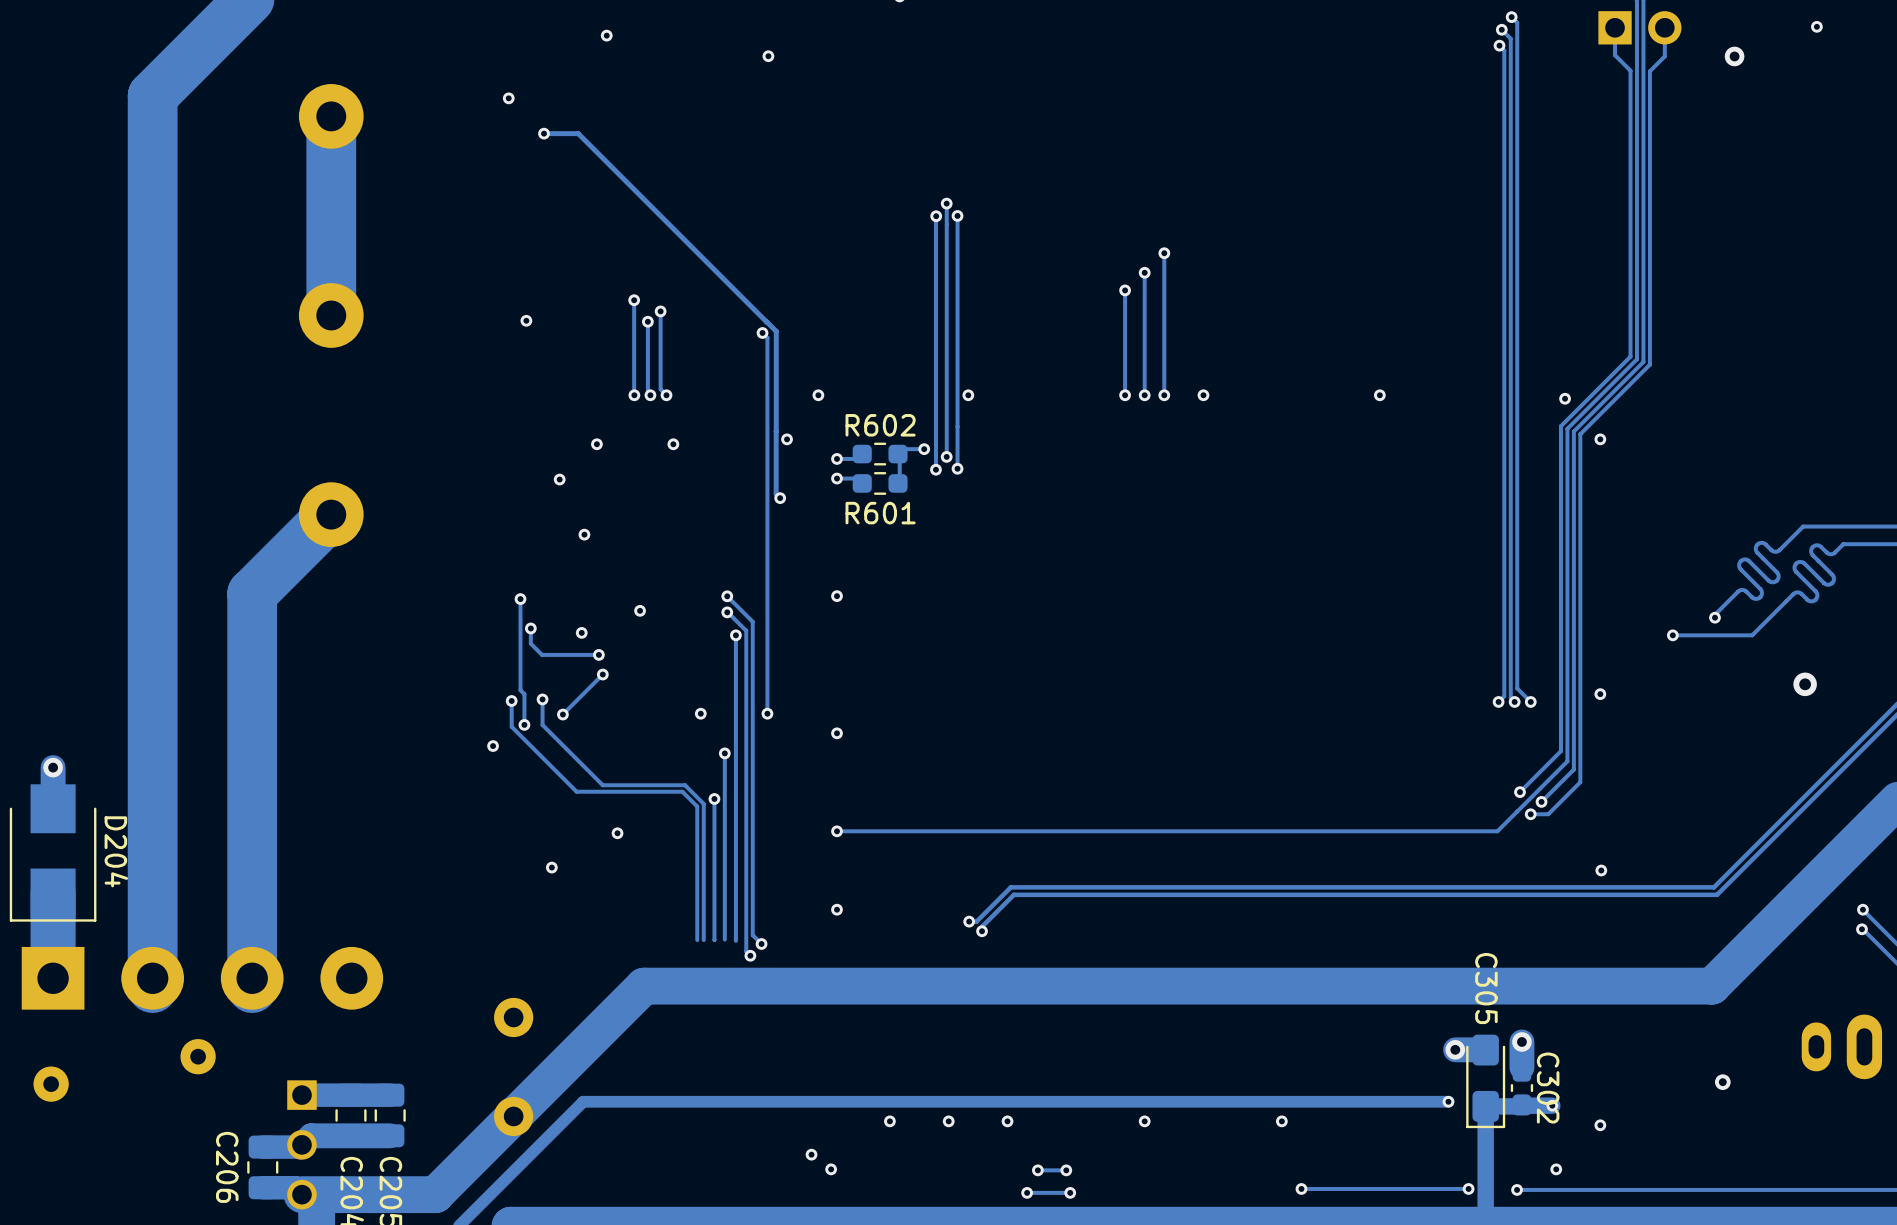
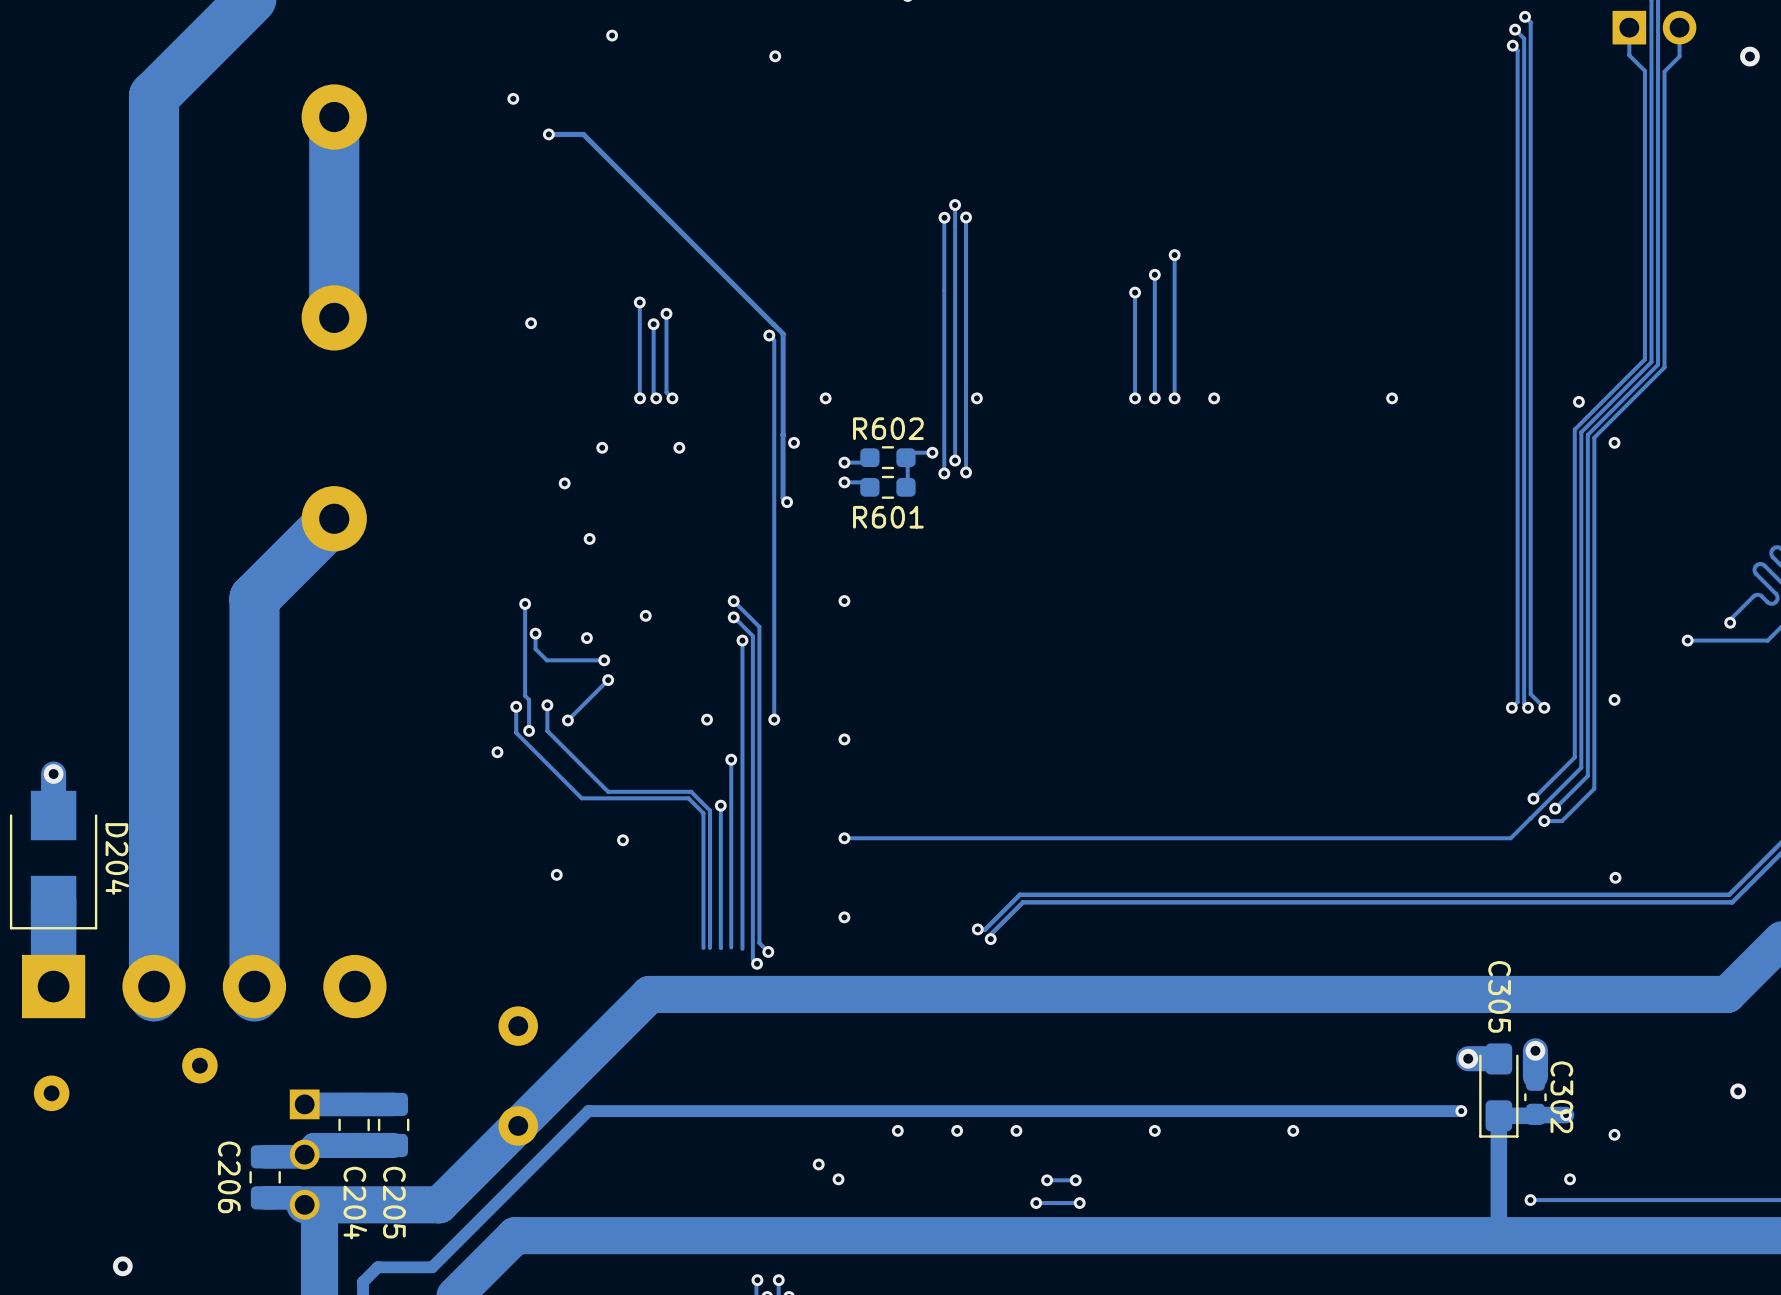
via: (1301, 1188) -> none
track: (1468, 1188) (1301, 1188) -> none
via: (1468, 1188) -> none

